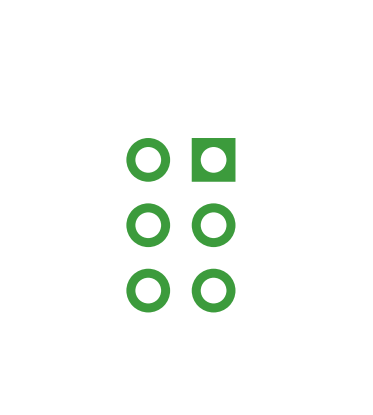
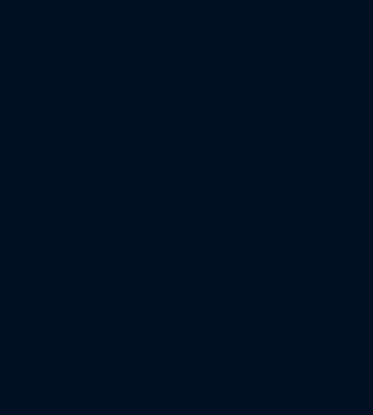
part: (180, 225) -> none

